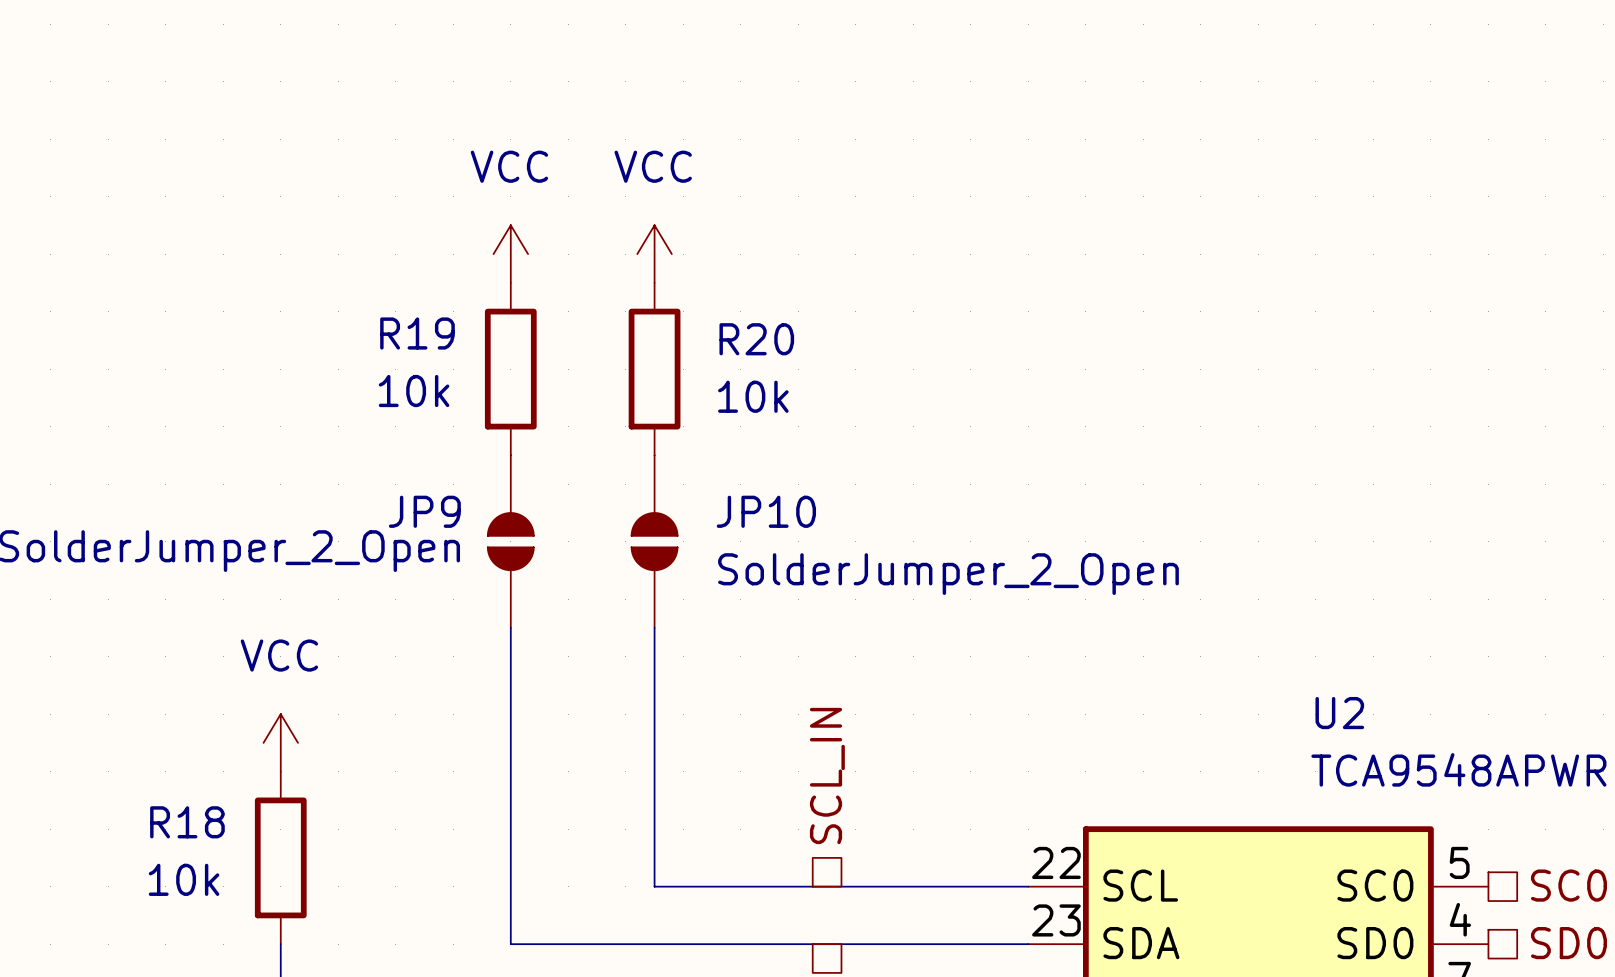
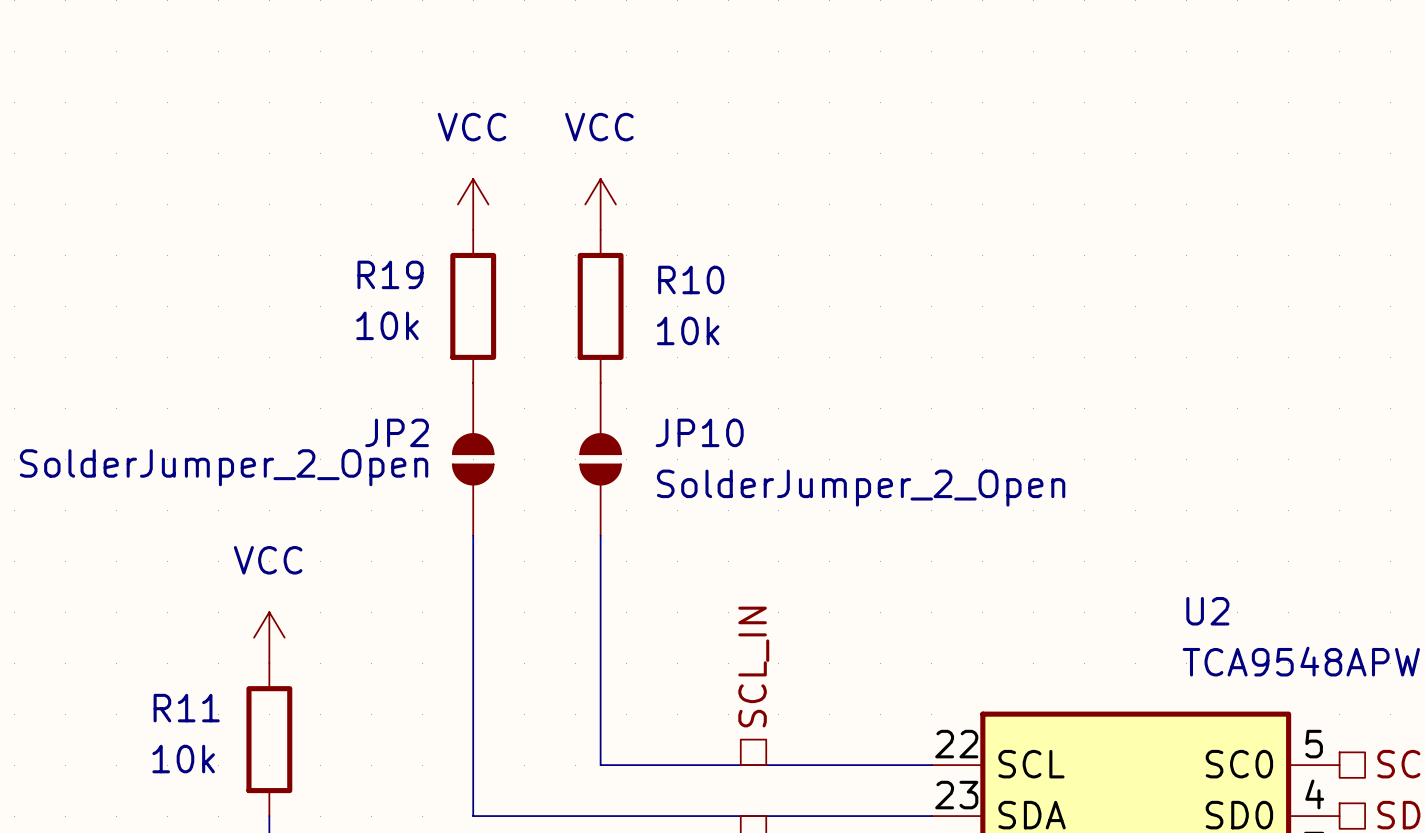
R20 name: R20 (756, 339) -> R10 (691, 279)
JP9 name: JP9 (424, 511) -> JP2 (397, 432)
R18 name: R18 (187, 822) -> R11 (186, 708)

